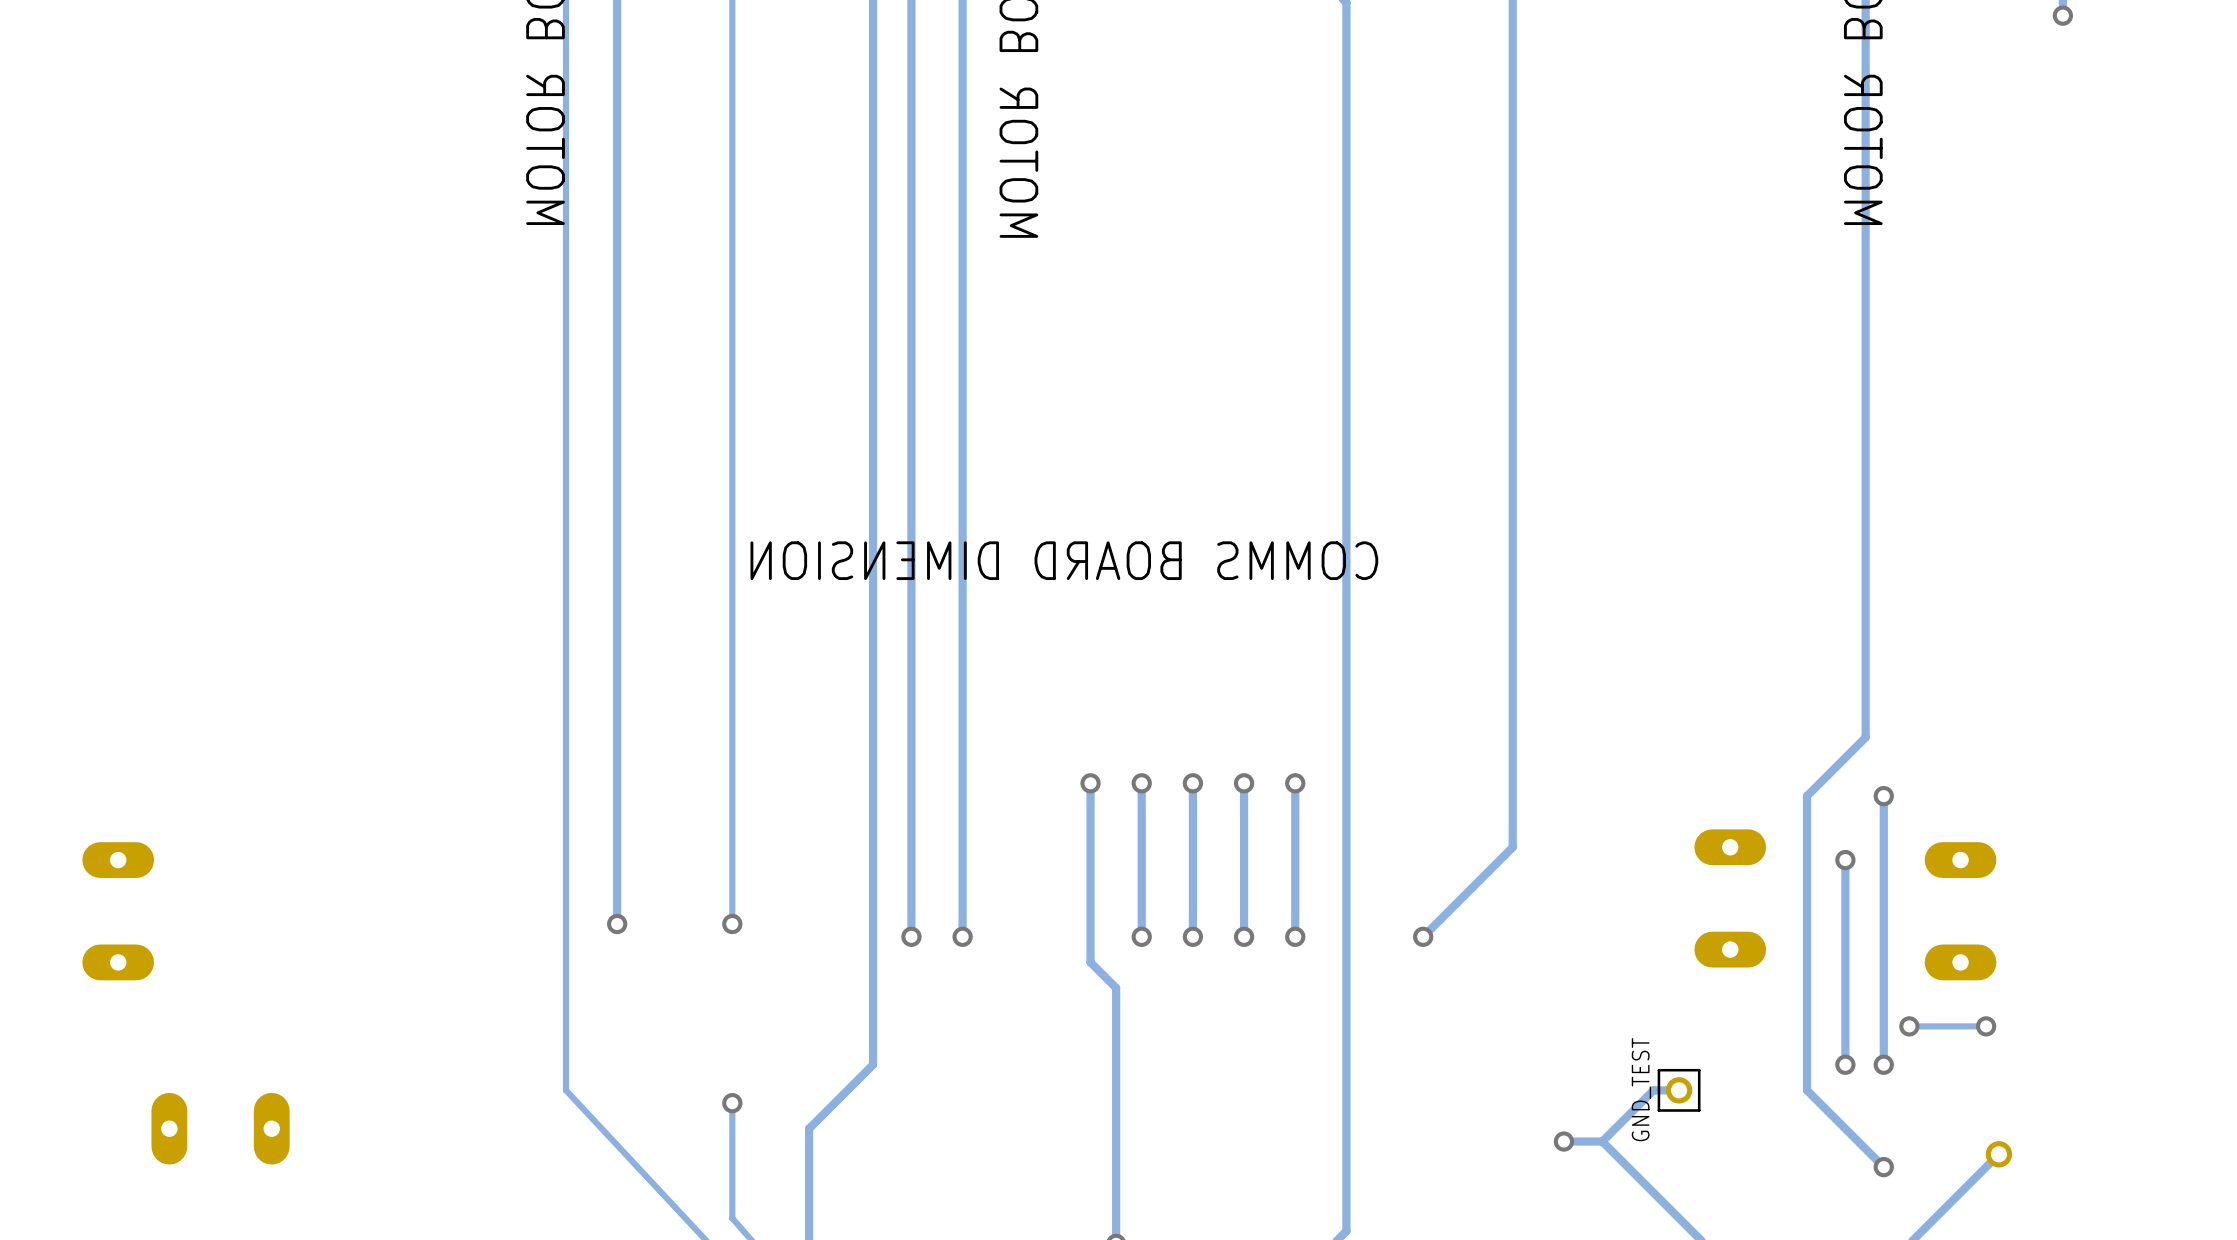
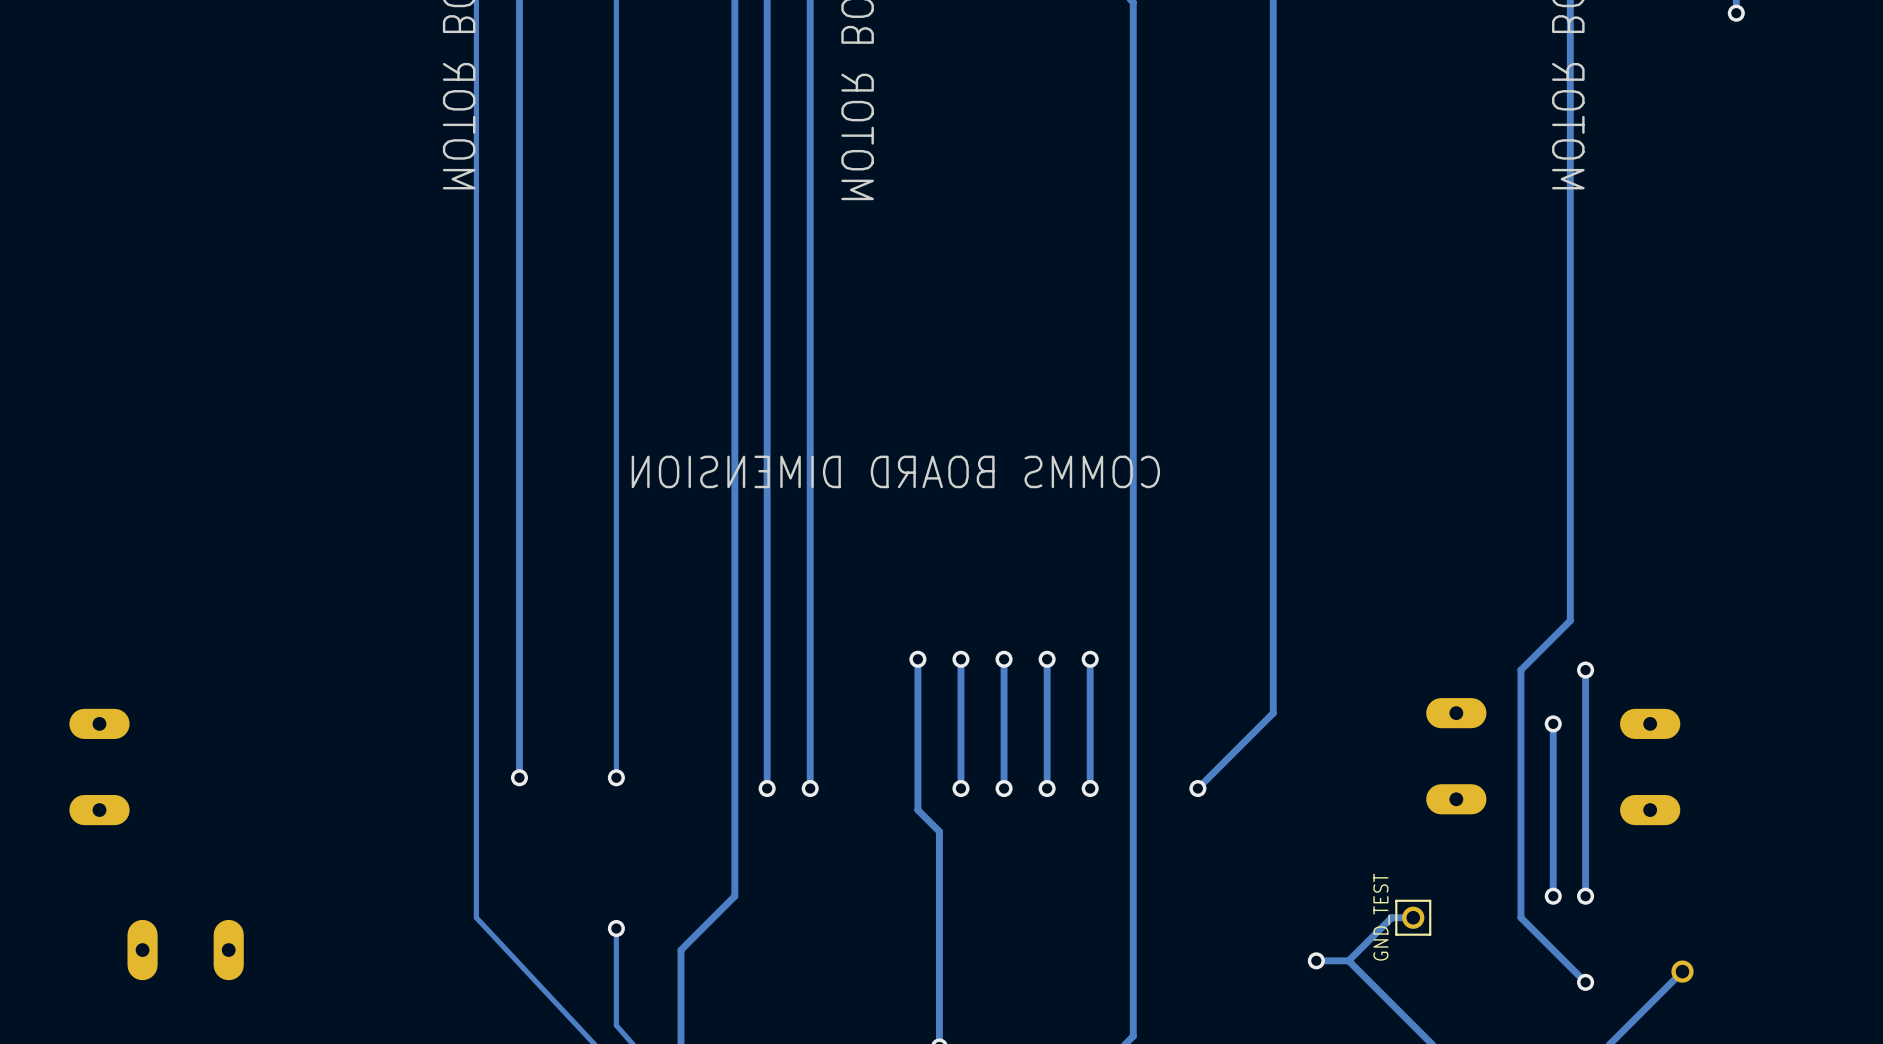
via: (1909, 1026) -> none
track: (1986, 1026) (1909, 1026) -> none
via: (1986, 1026) -> none

